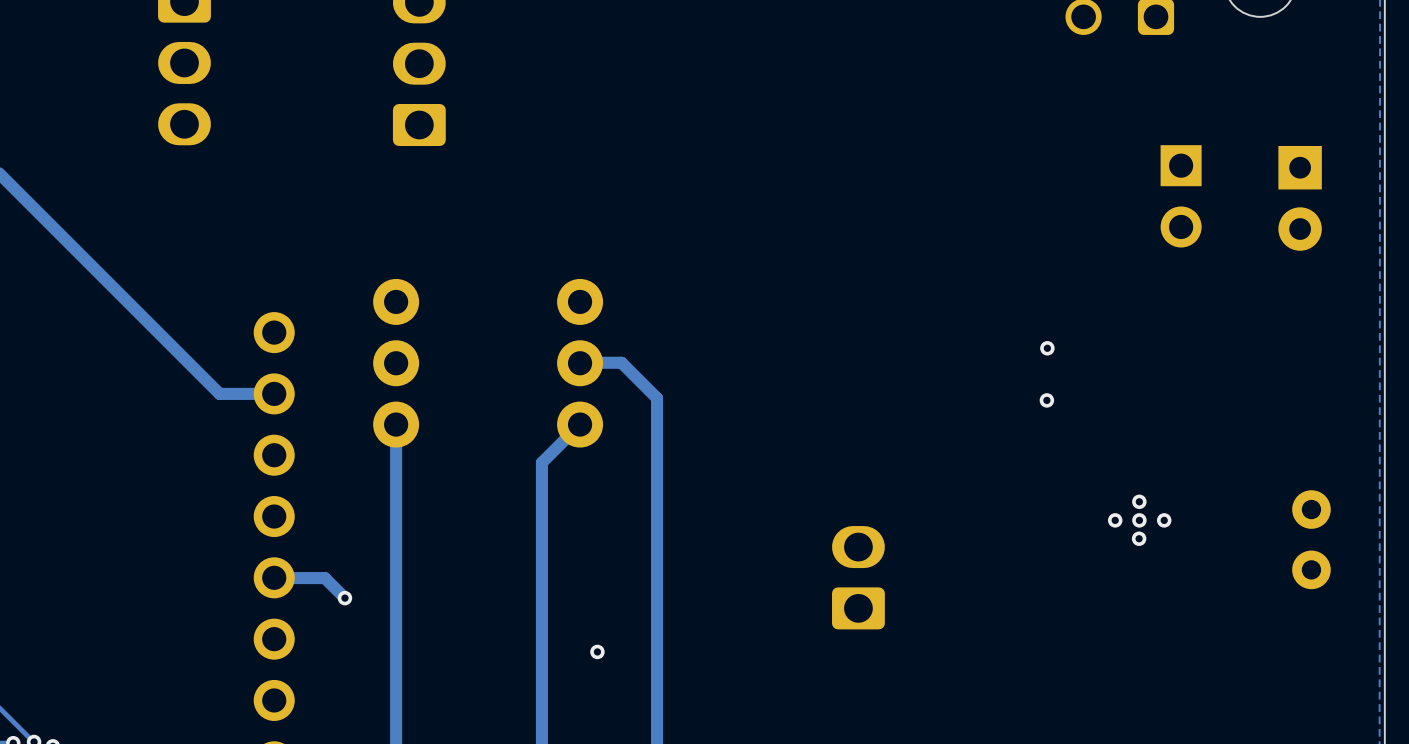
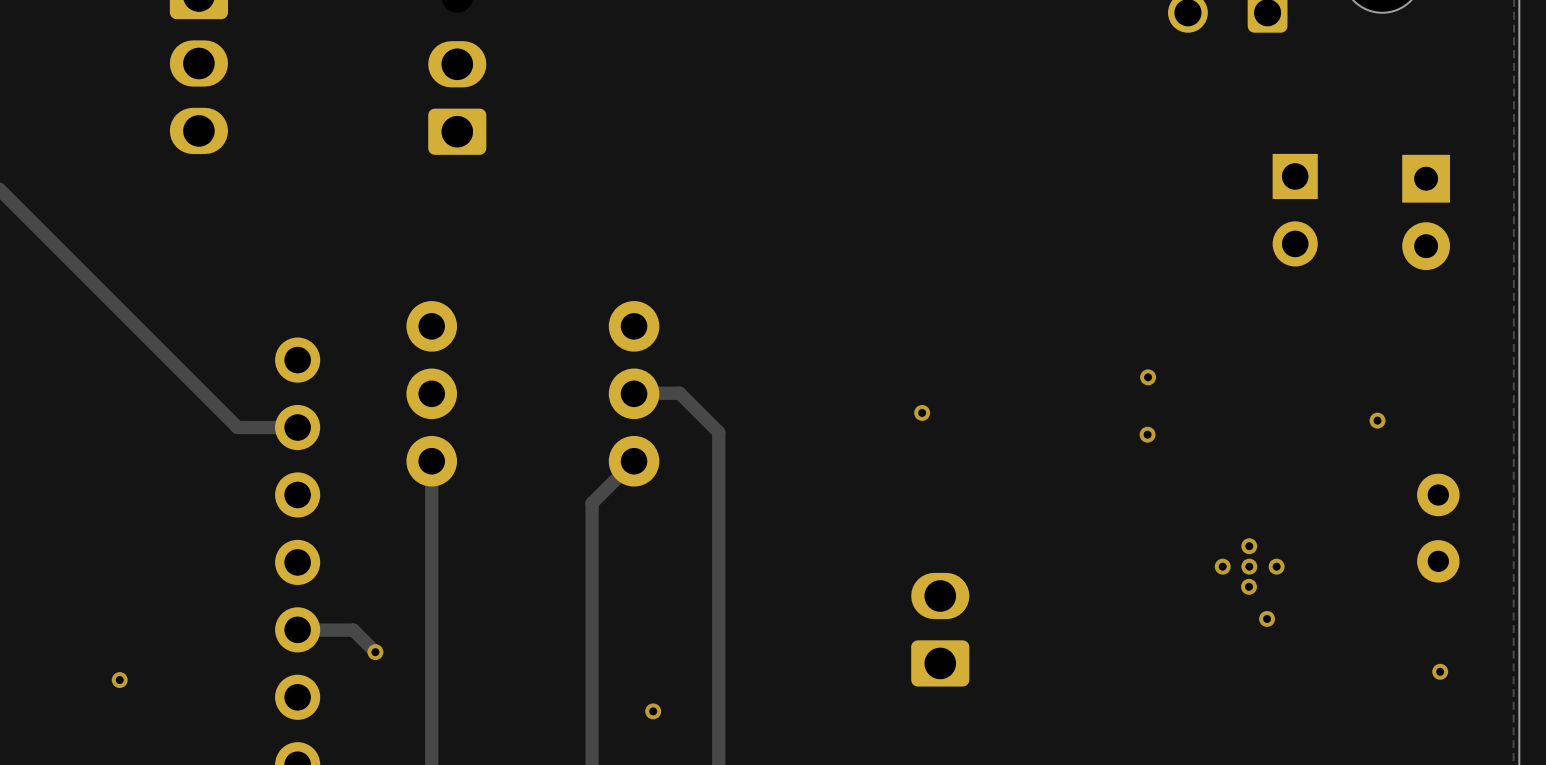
via: none -> (922, 412)
via: none -> (1377, 420)
part position: (1311, 539) -> (1438, 528)
via: none -> (1267, 618)
via: none -> (1440, 671)
via: none -> (119, 680)

